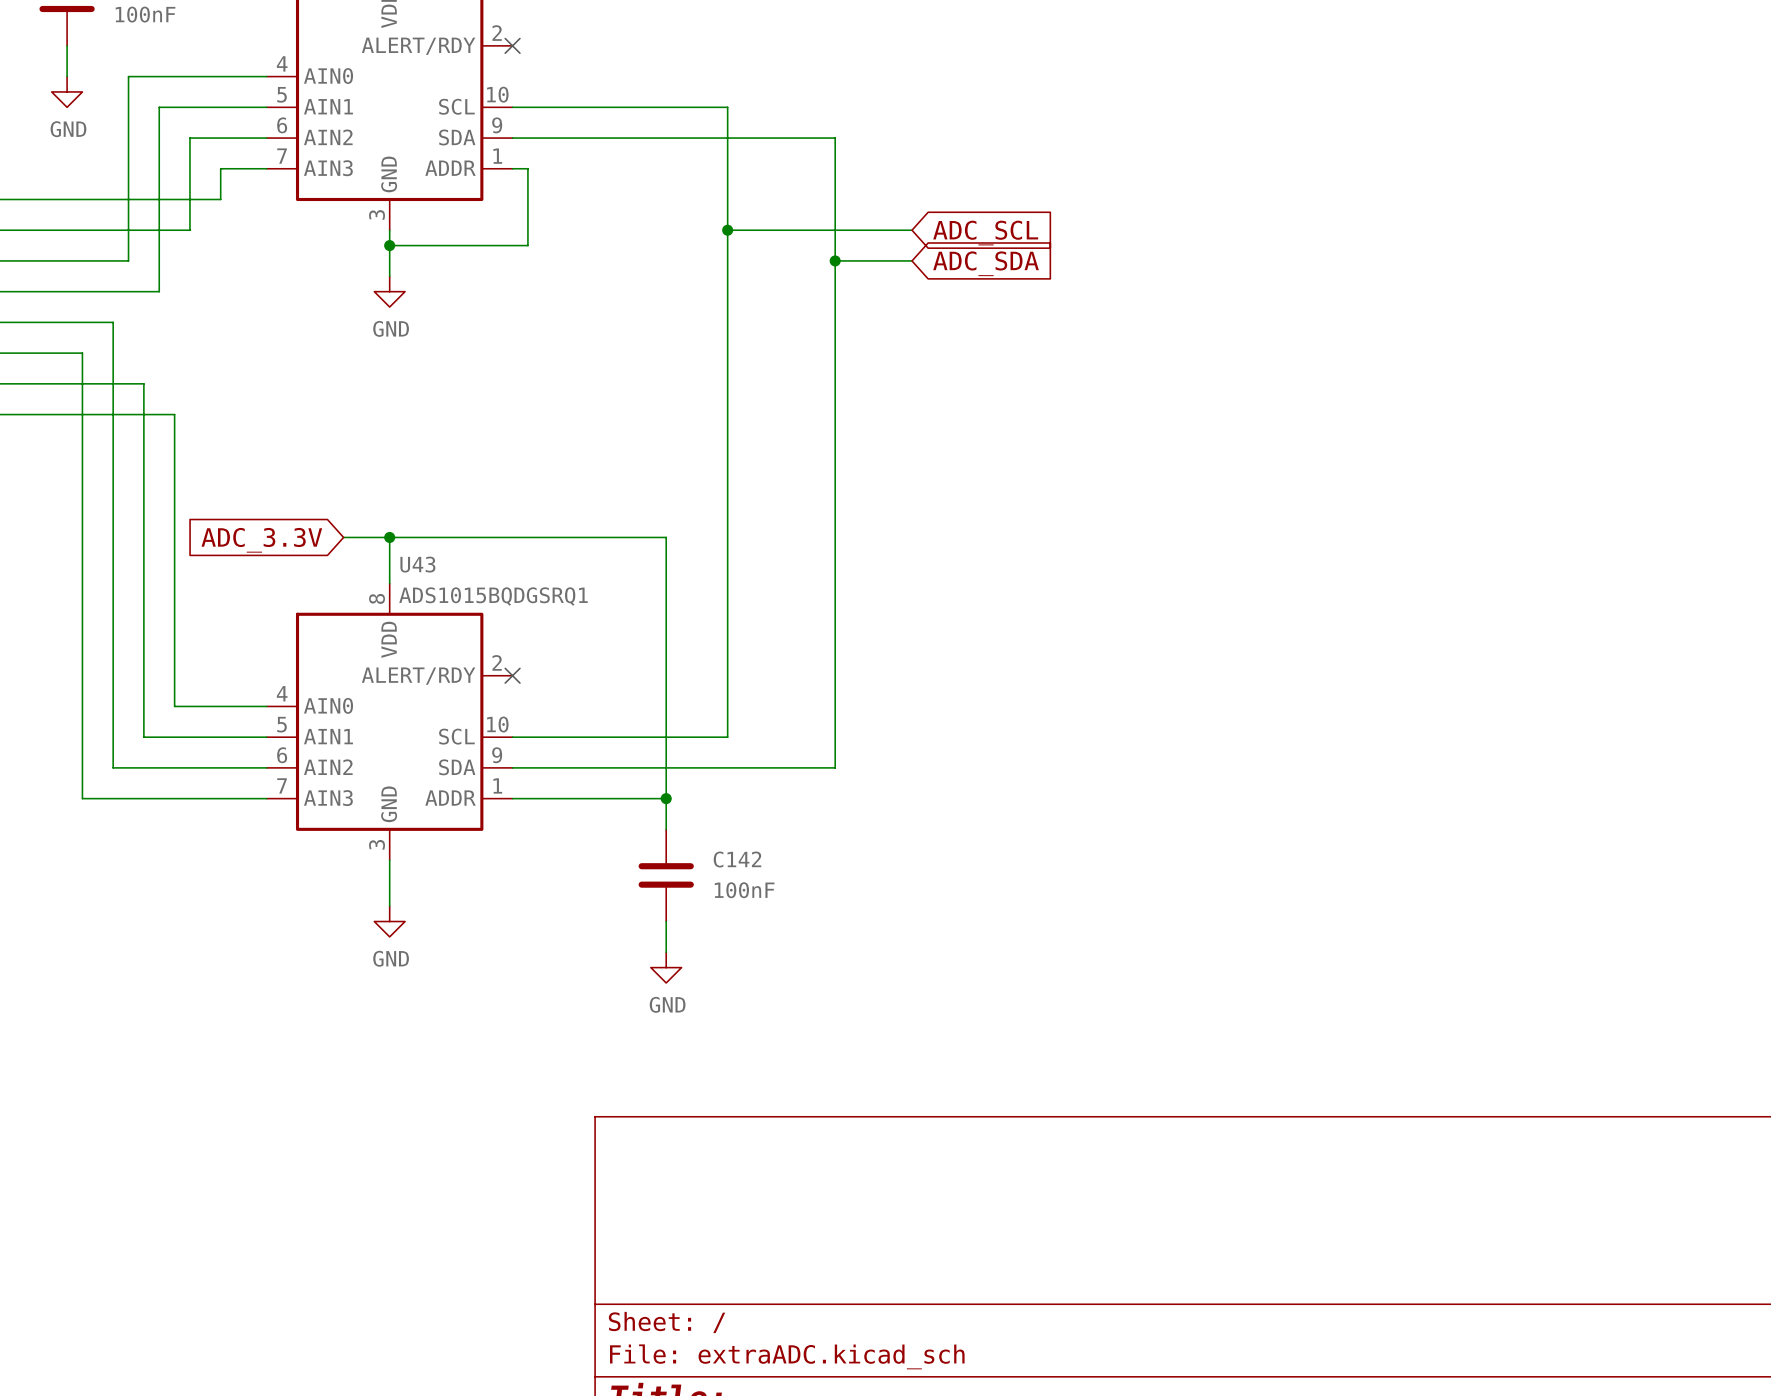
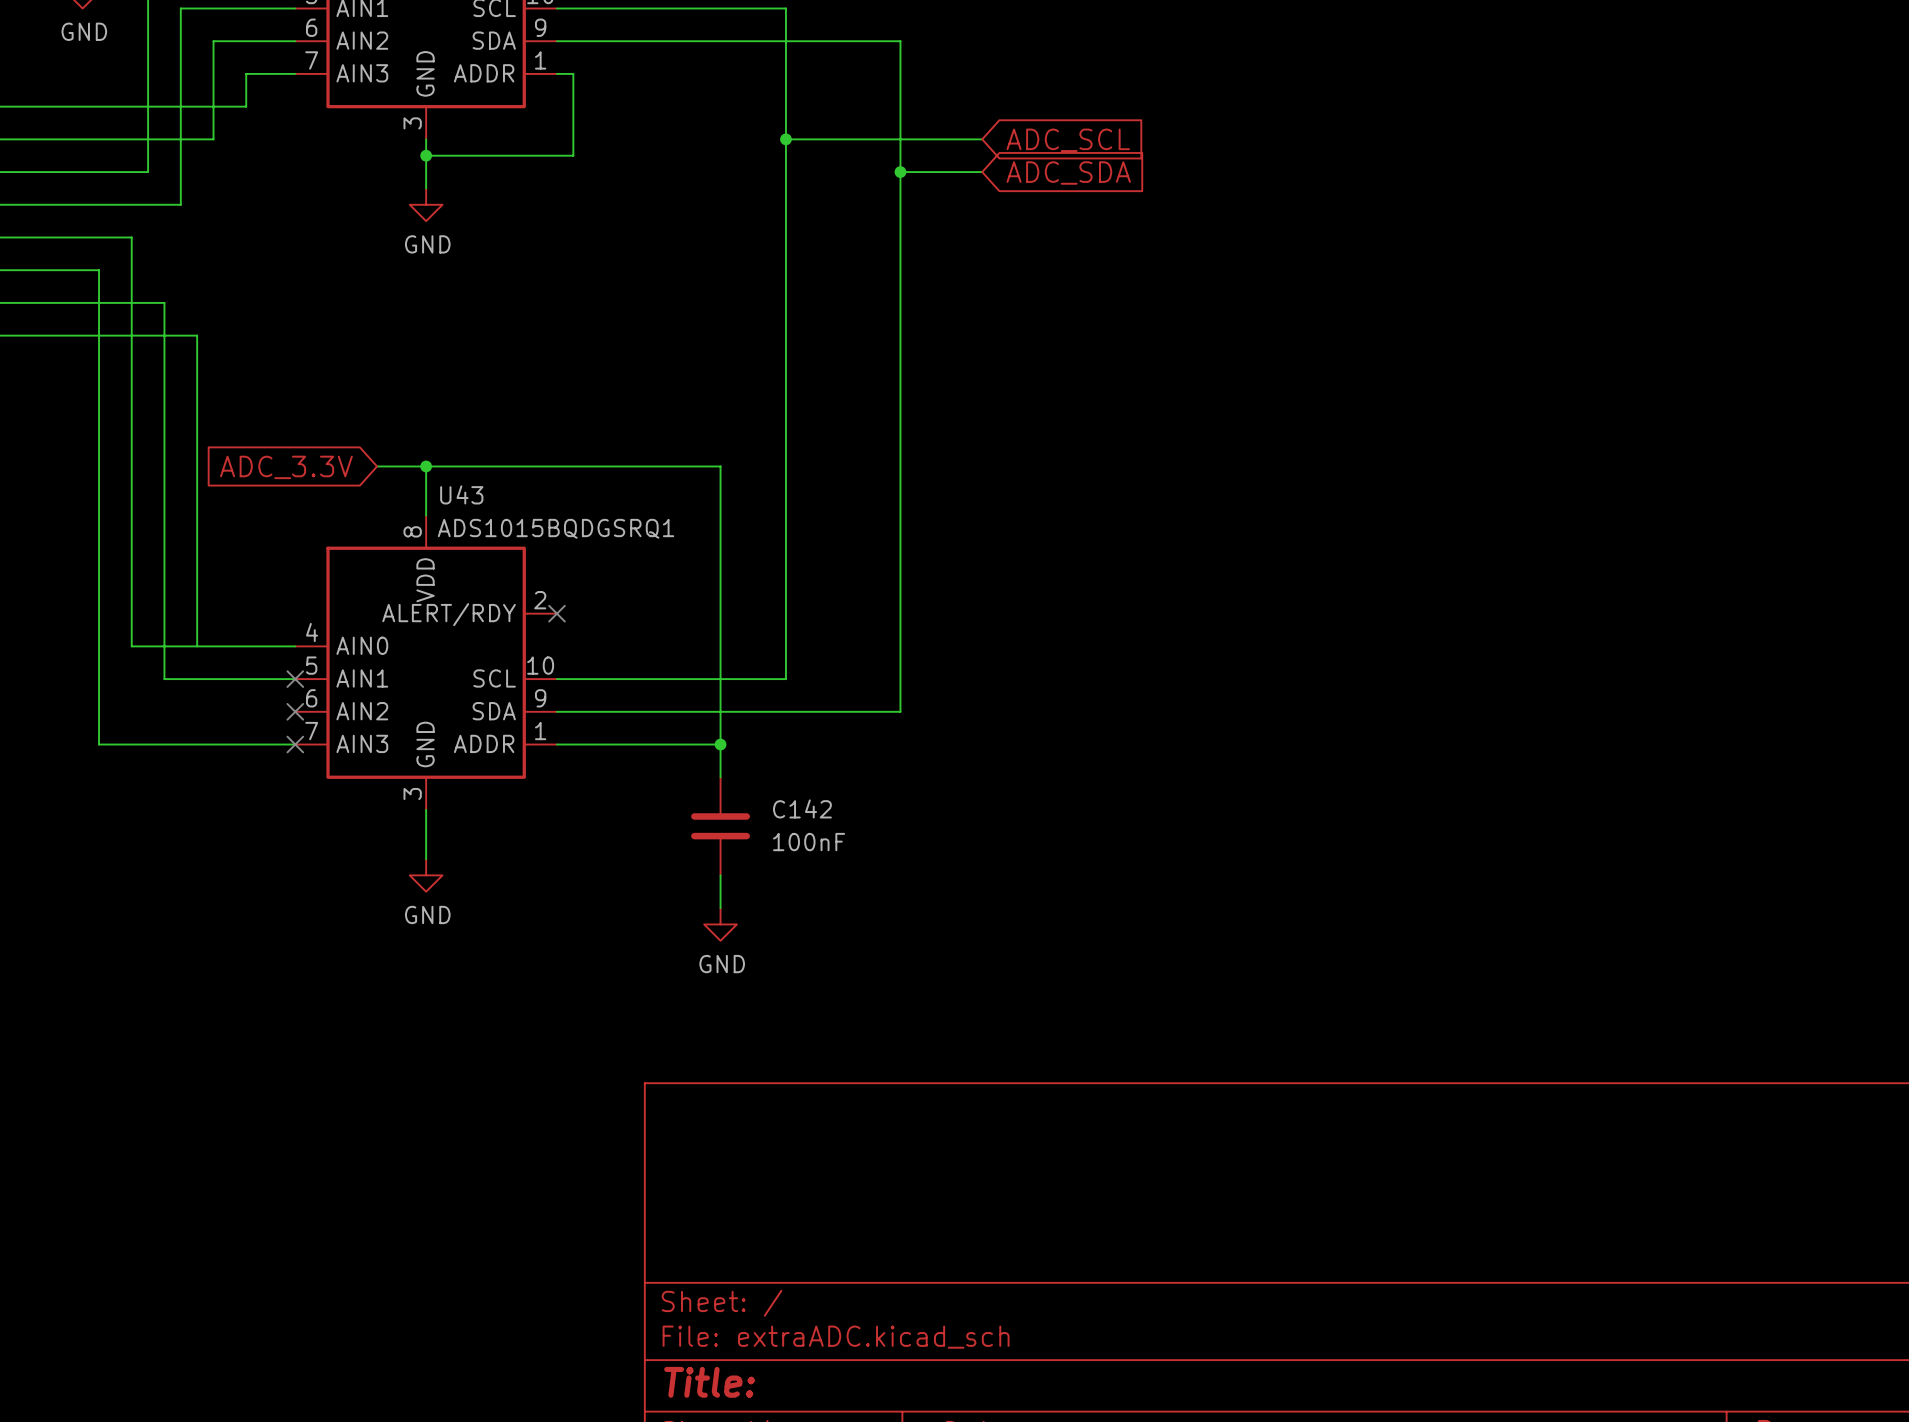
wire: (113, 706) (113, 767) (266, 767) -> (131, 646) (197, 646)
no-connect mark: none -> (295, 679)
no-connect mark: none -> (295, 711)
no-connect mark: none -> (295, 744)

